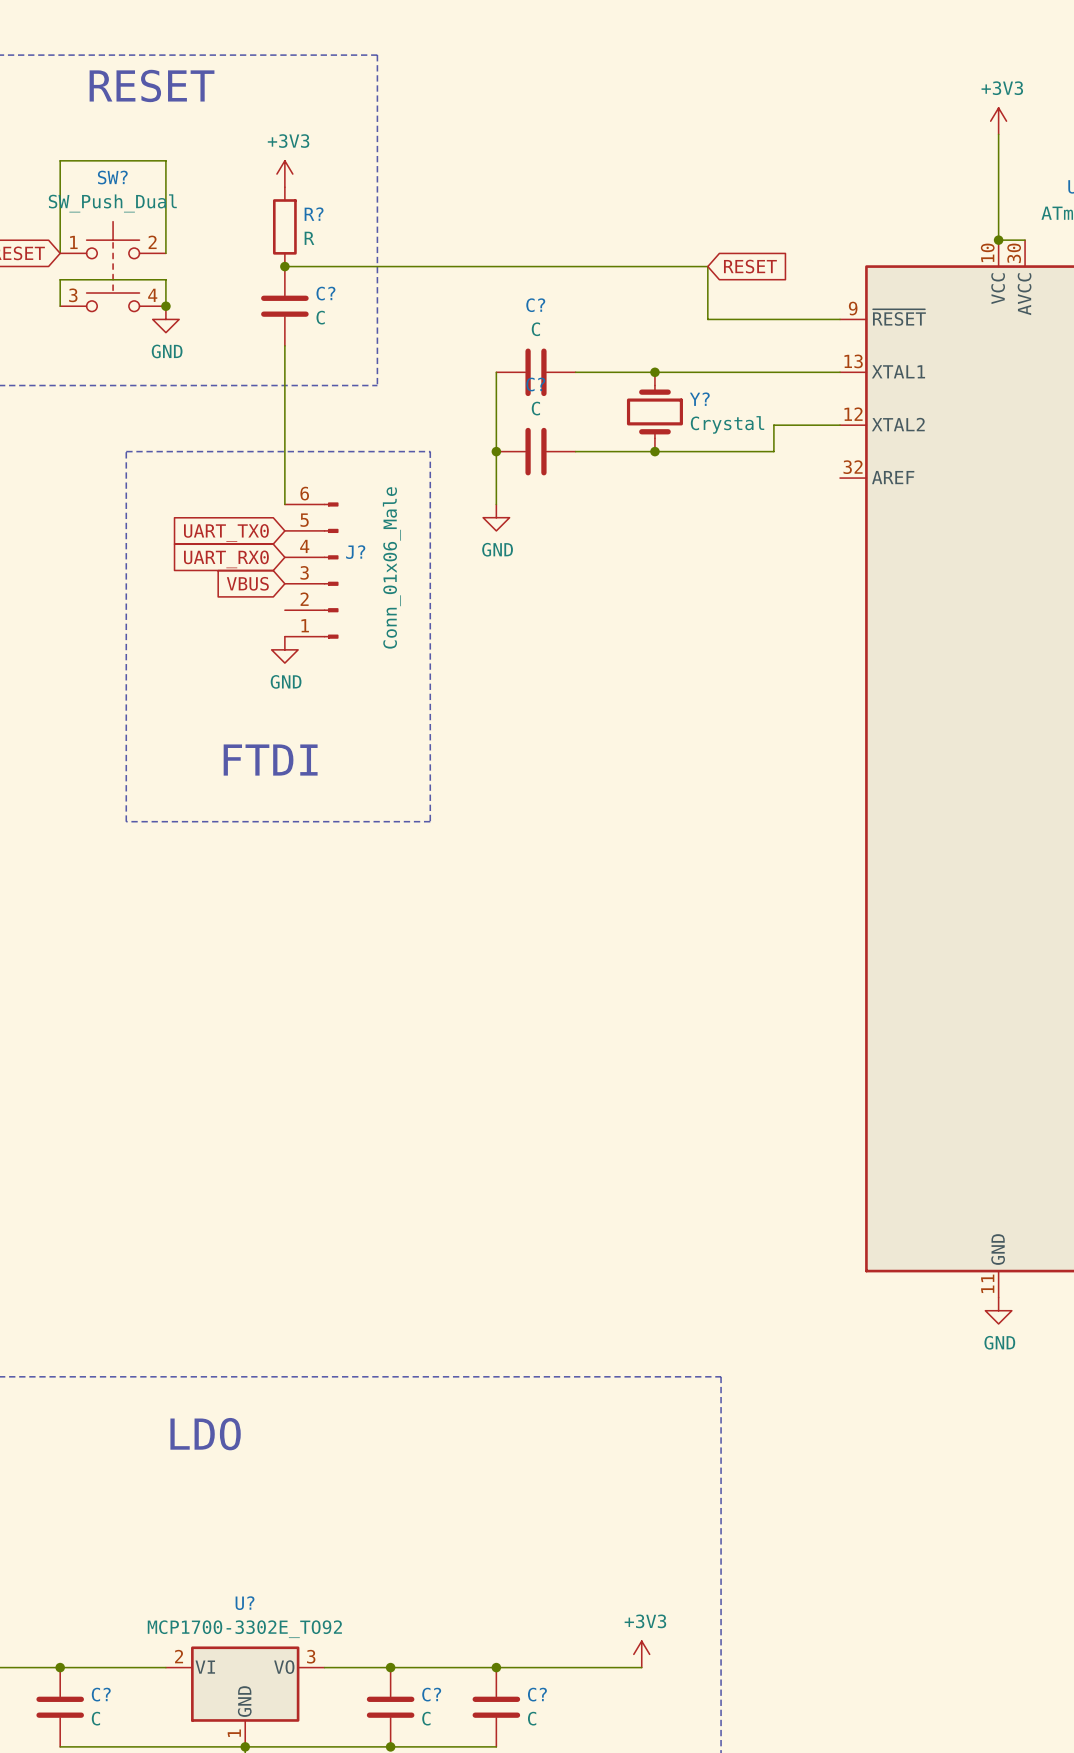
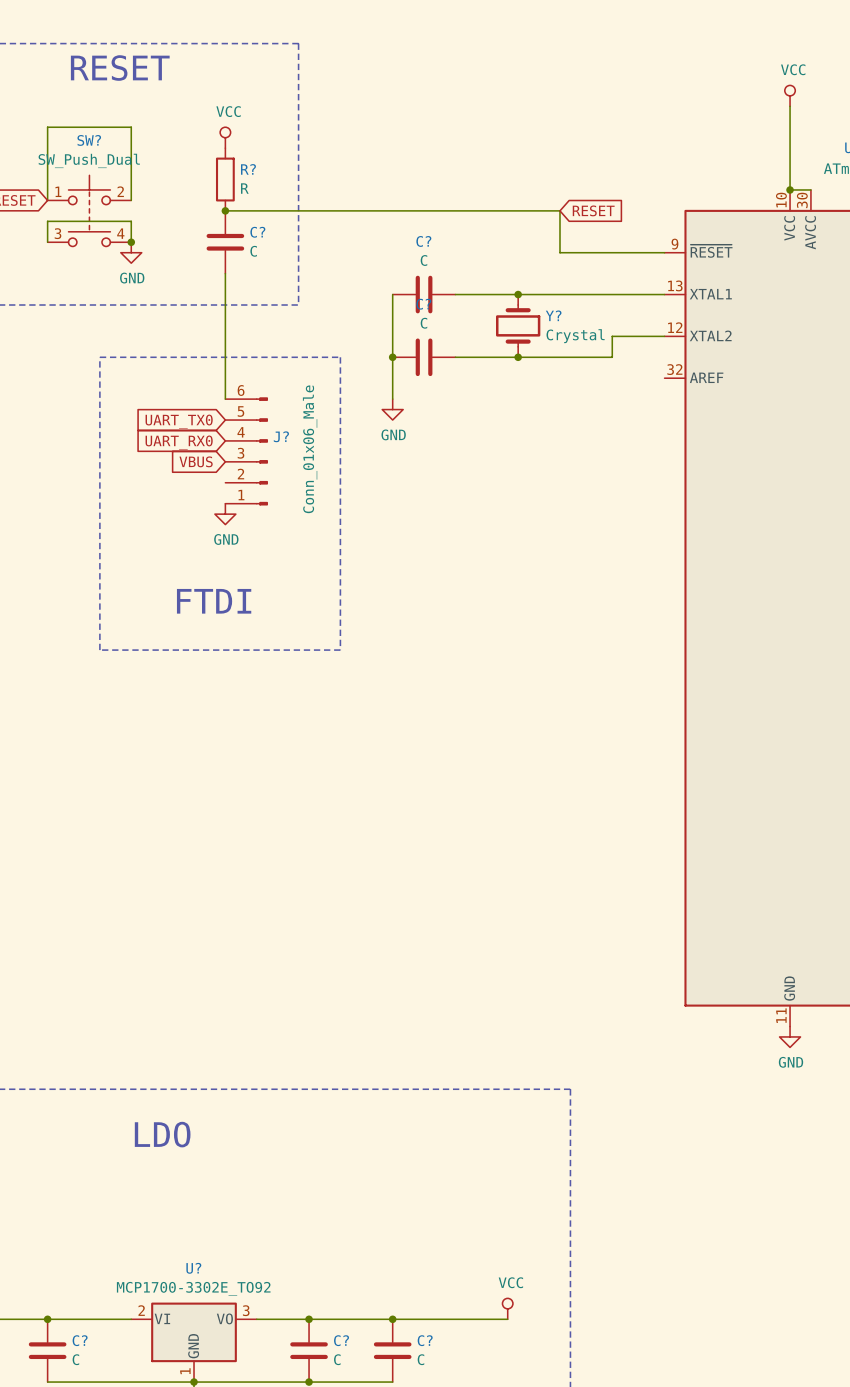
power symbol: +3V3 (998, 121) -> VCC (790, 95)
power symbol: +3V3 (284, 174) -> VCC (225, 137)
power symbol: +3V3 (641, 1654) -> VCC (507, 1308)

